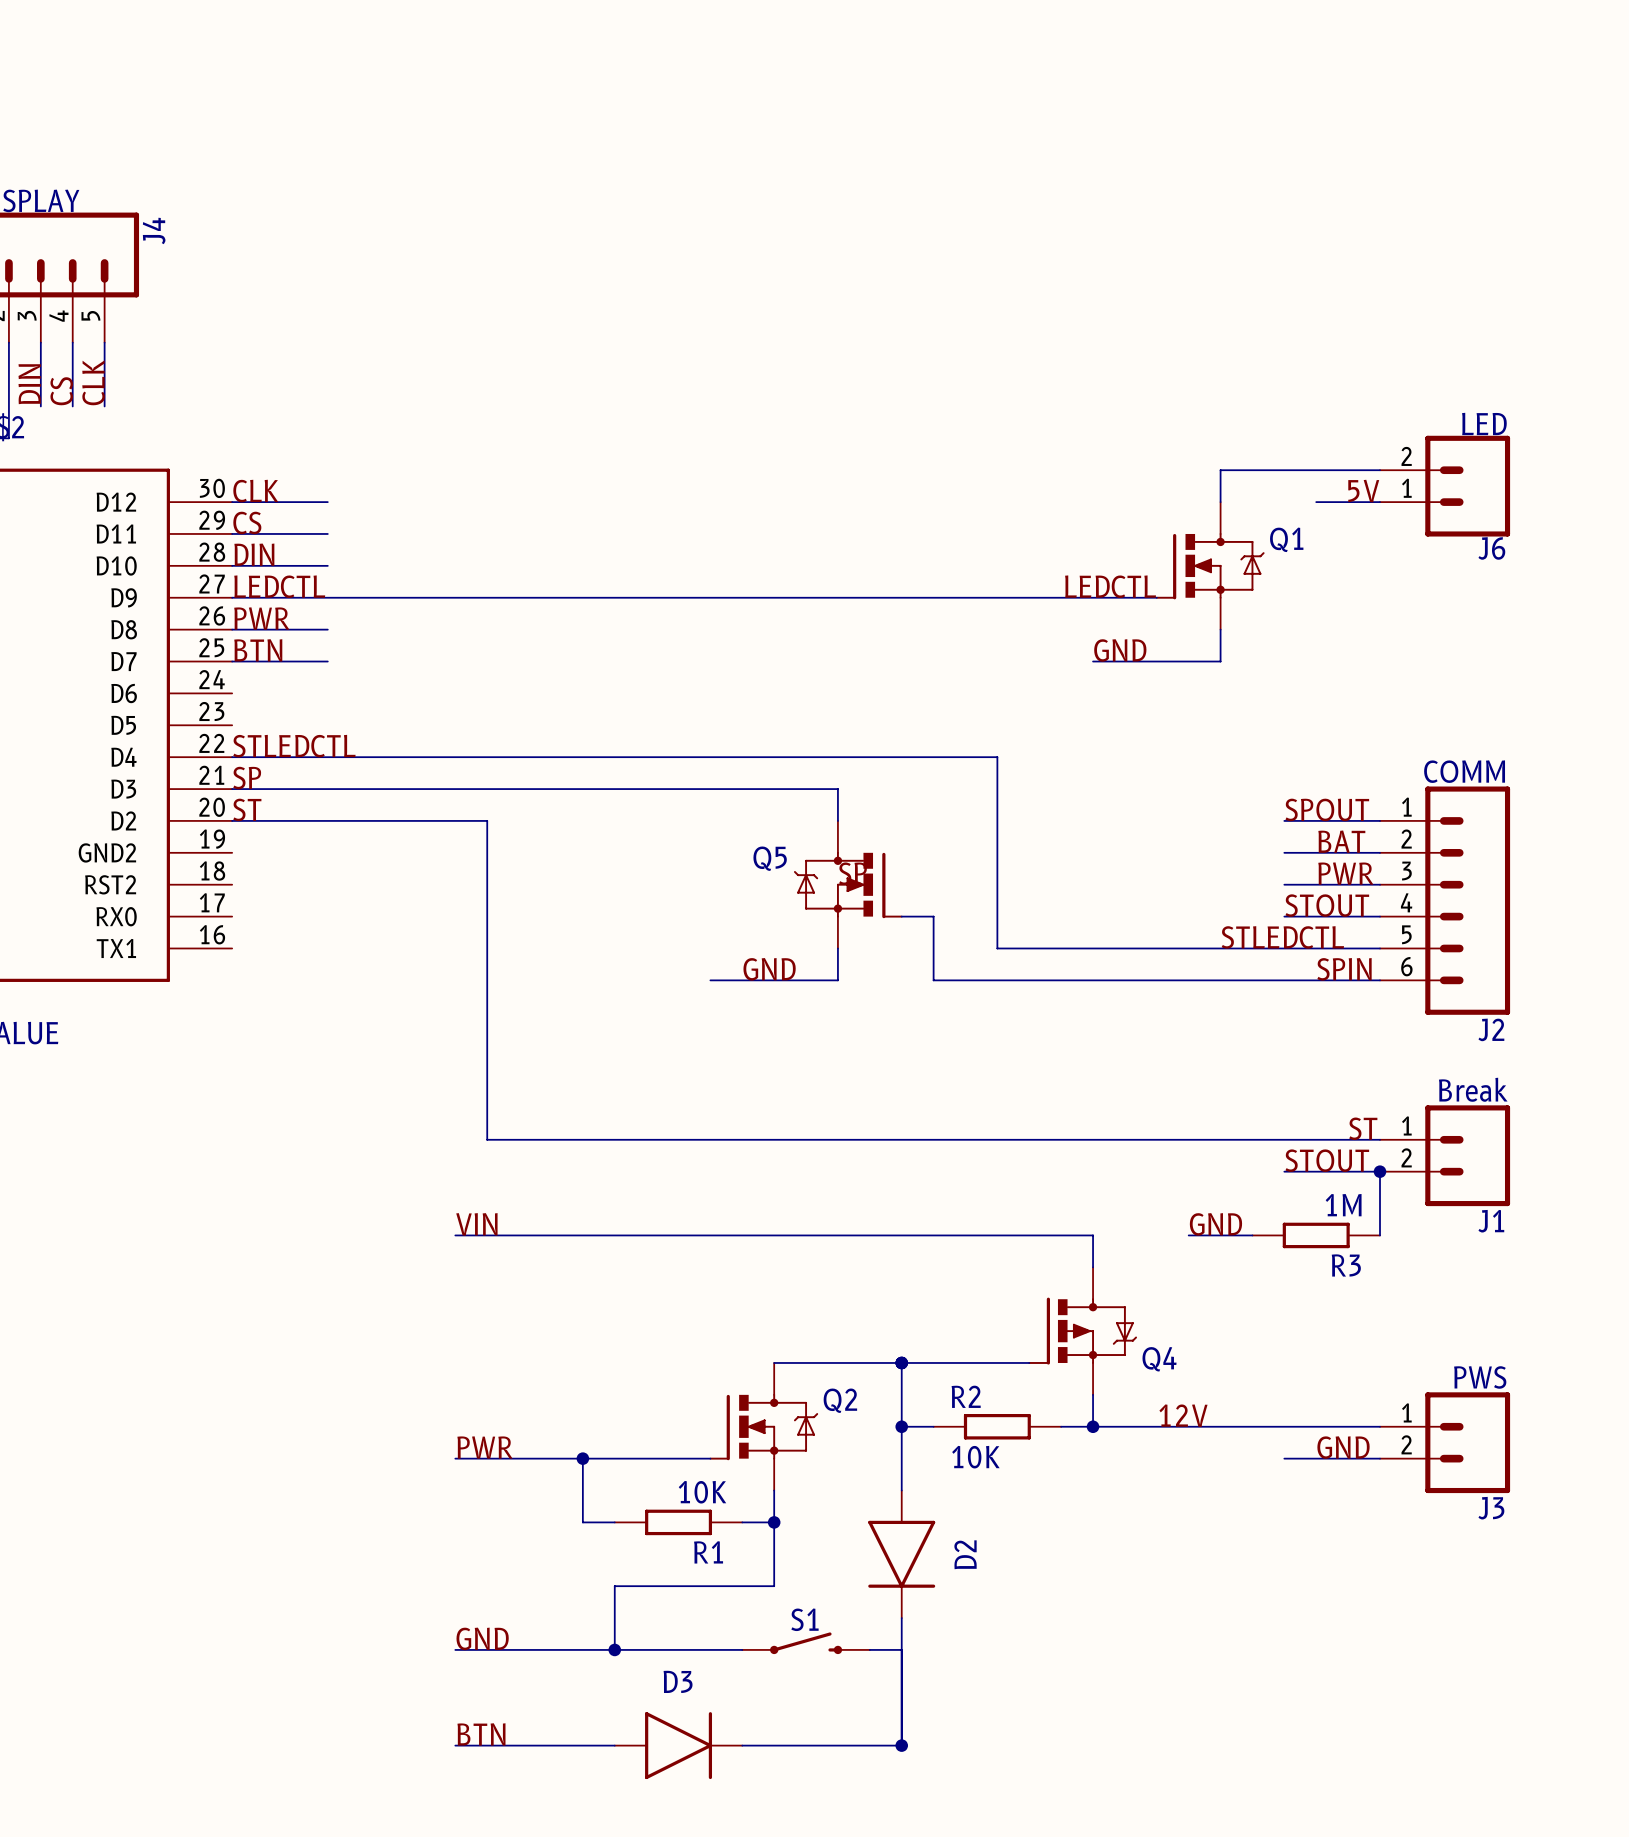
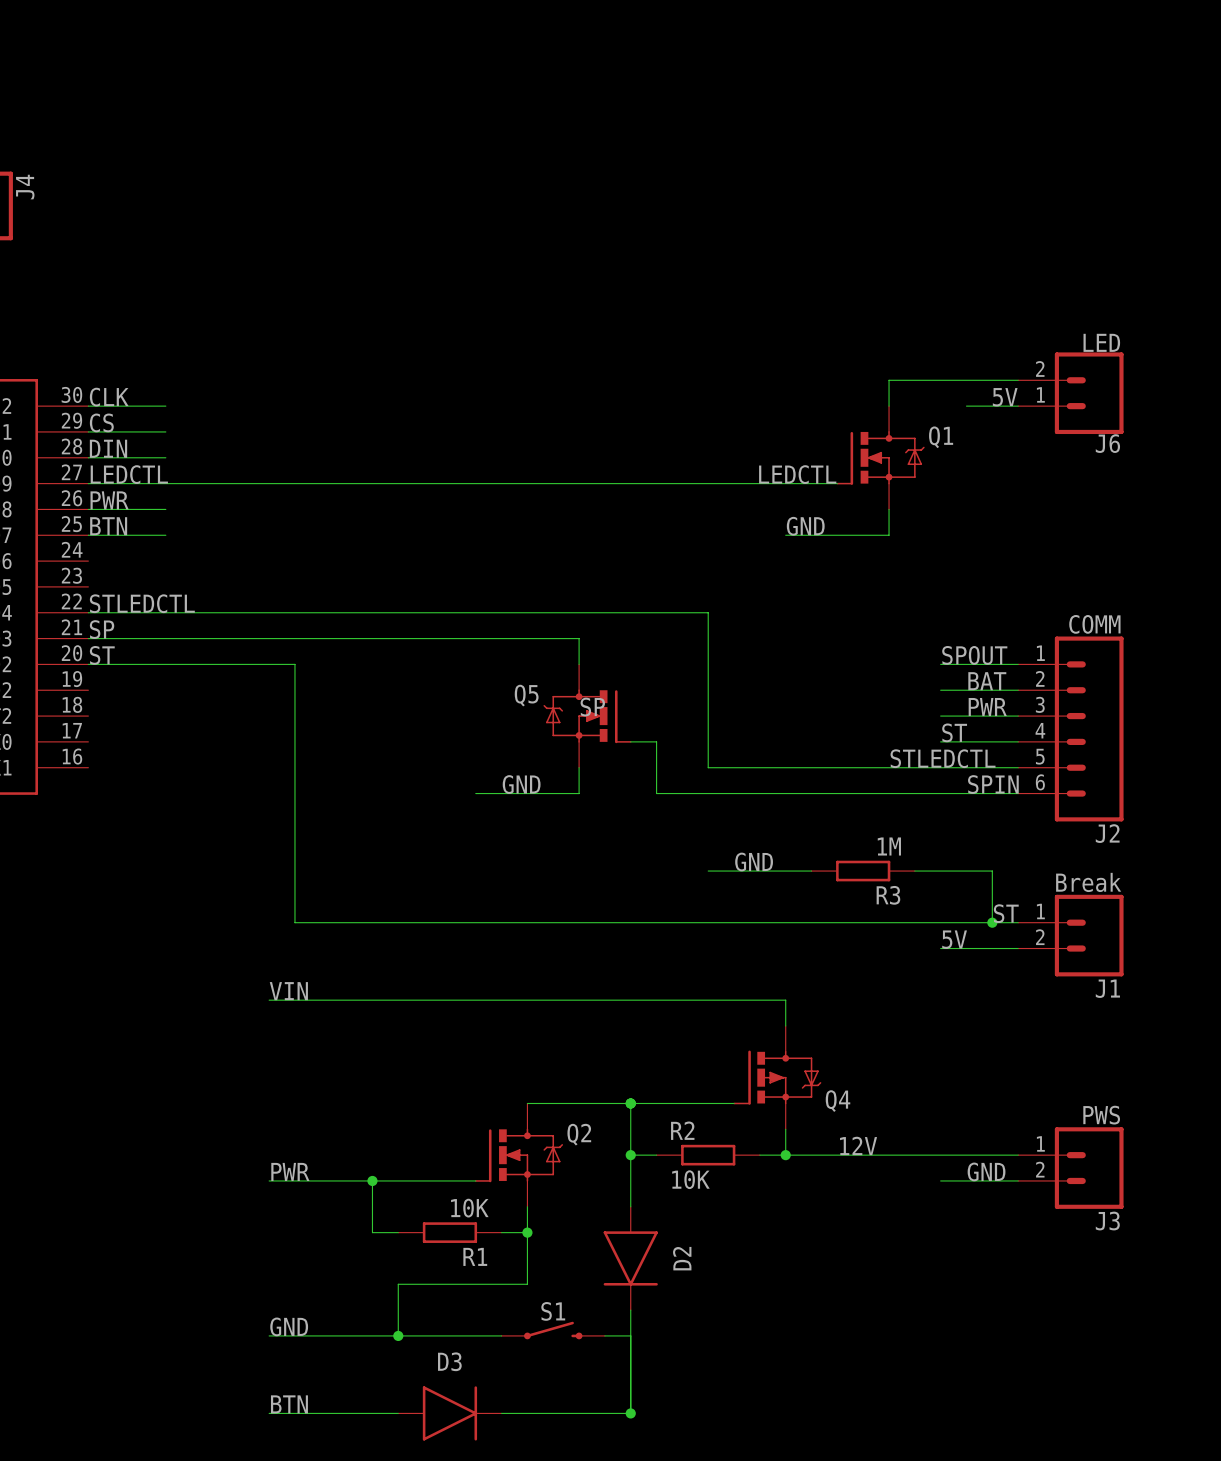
label: STOUT (1327, 905) -> ST (954, 732)
wire: none -> (708, 871) (811, 871)
wire: none -> (914, 871) (992, 871) (992, 922)
label: STOUT (1327, 1160) -> 5V (954, 939)
wire: (1380, 1171) (1380, 1235) -> none
junction position: (1380, 1171) -> (992, 922)
label position: GND (1215, 1224) -> GND (754, 862)
wire: (1188, 1235) (1252, 1235) -> none
R3 position: (1316, 1235) -> (863, 871)

